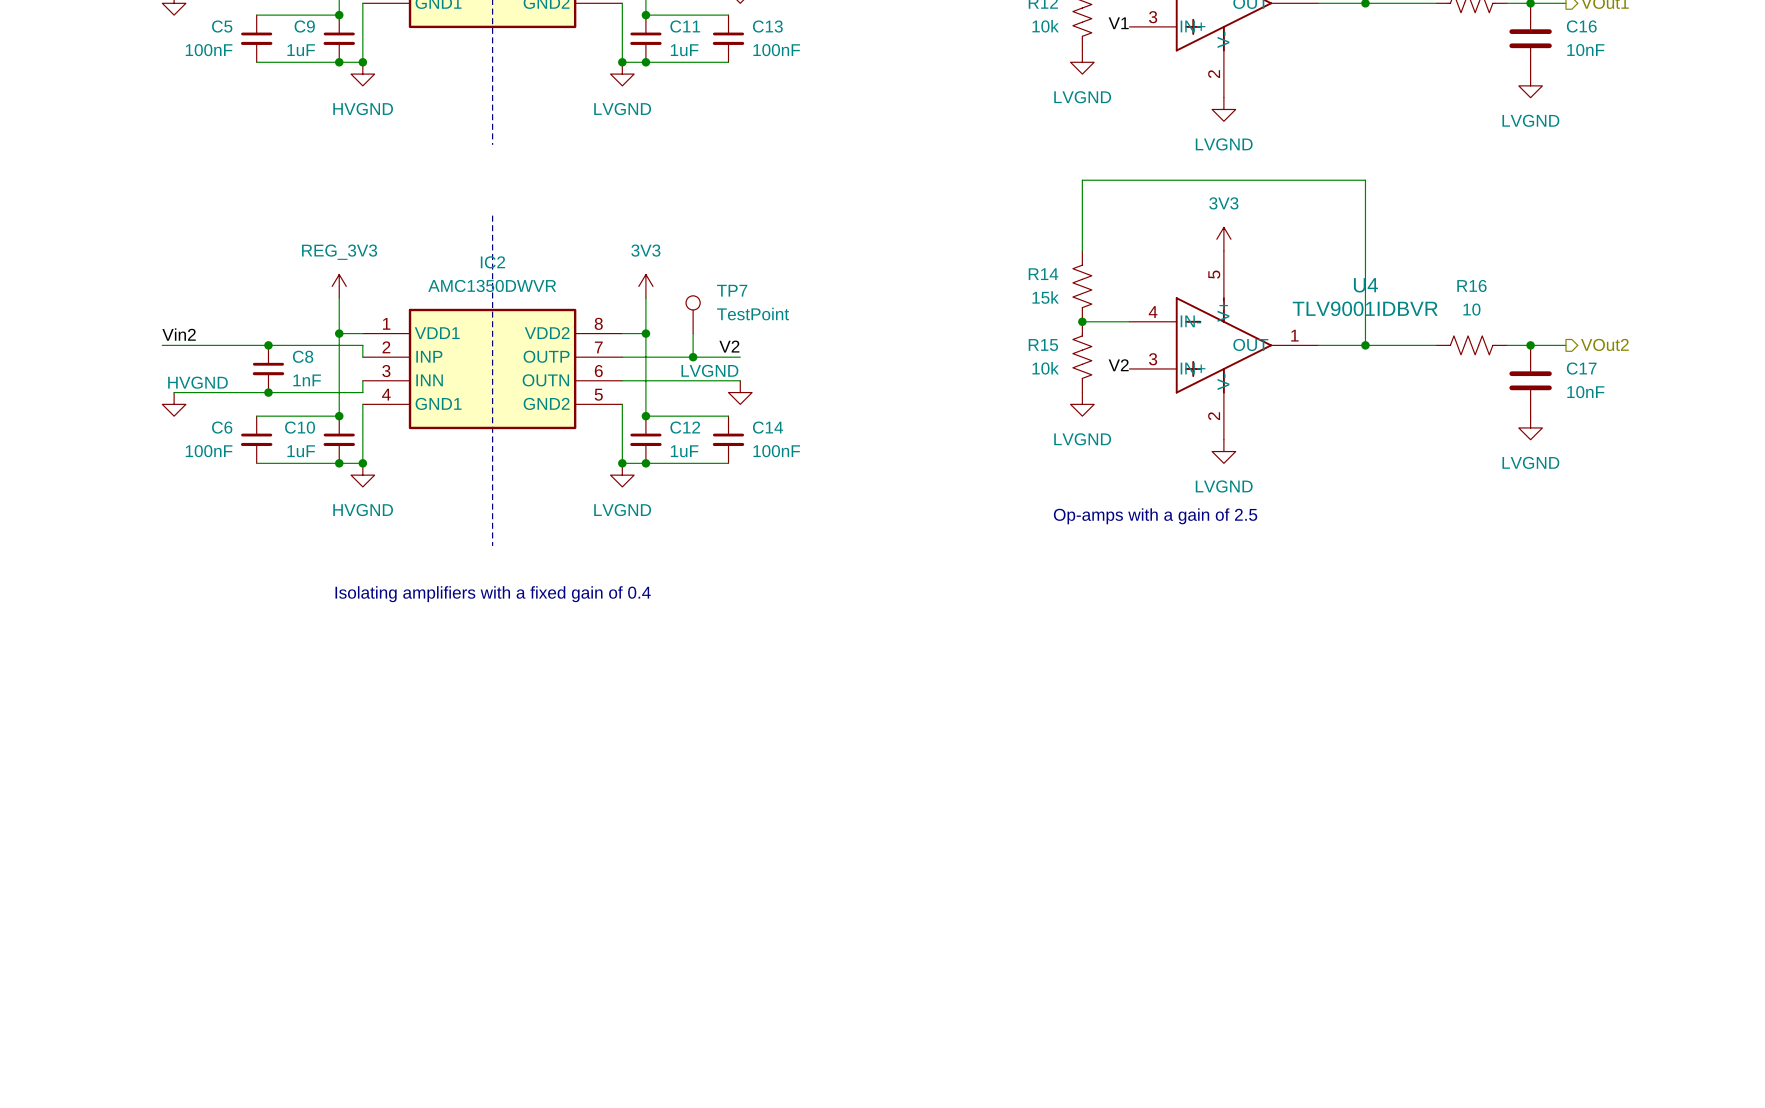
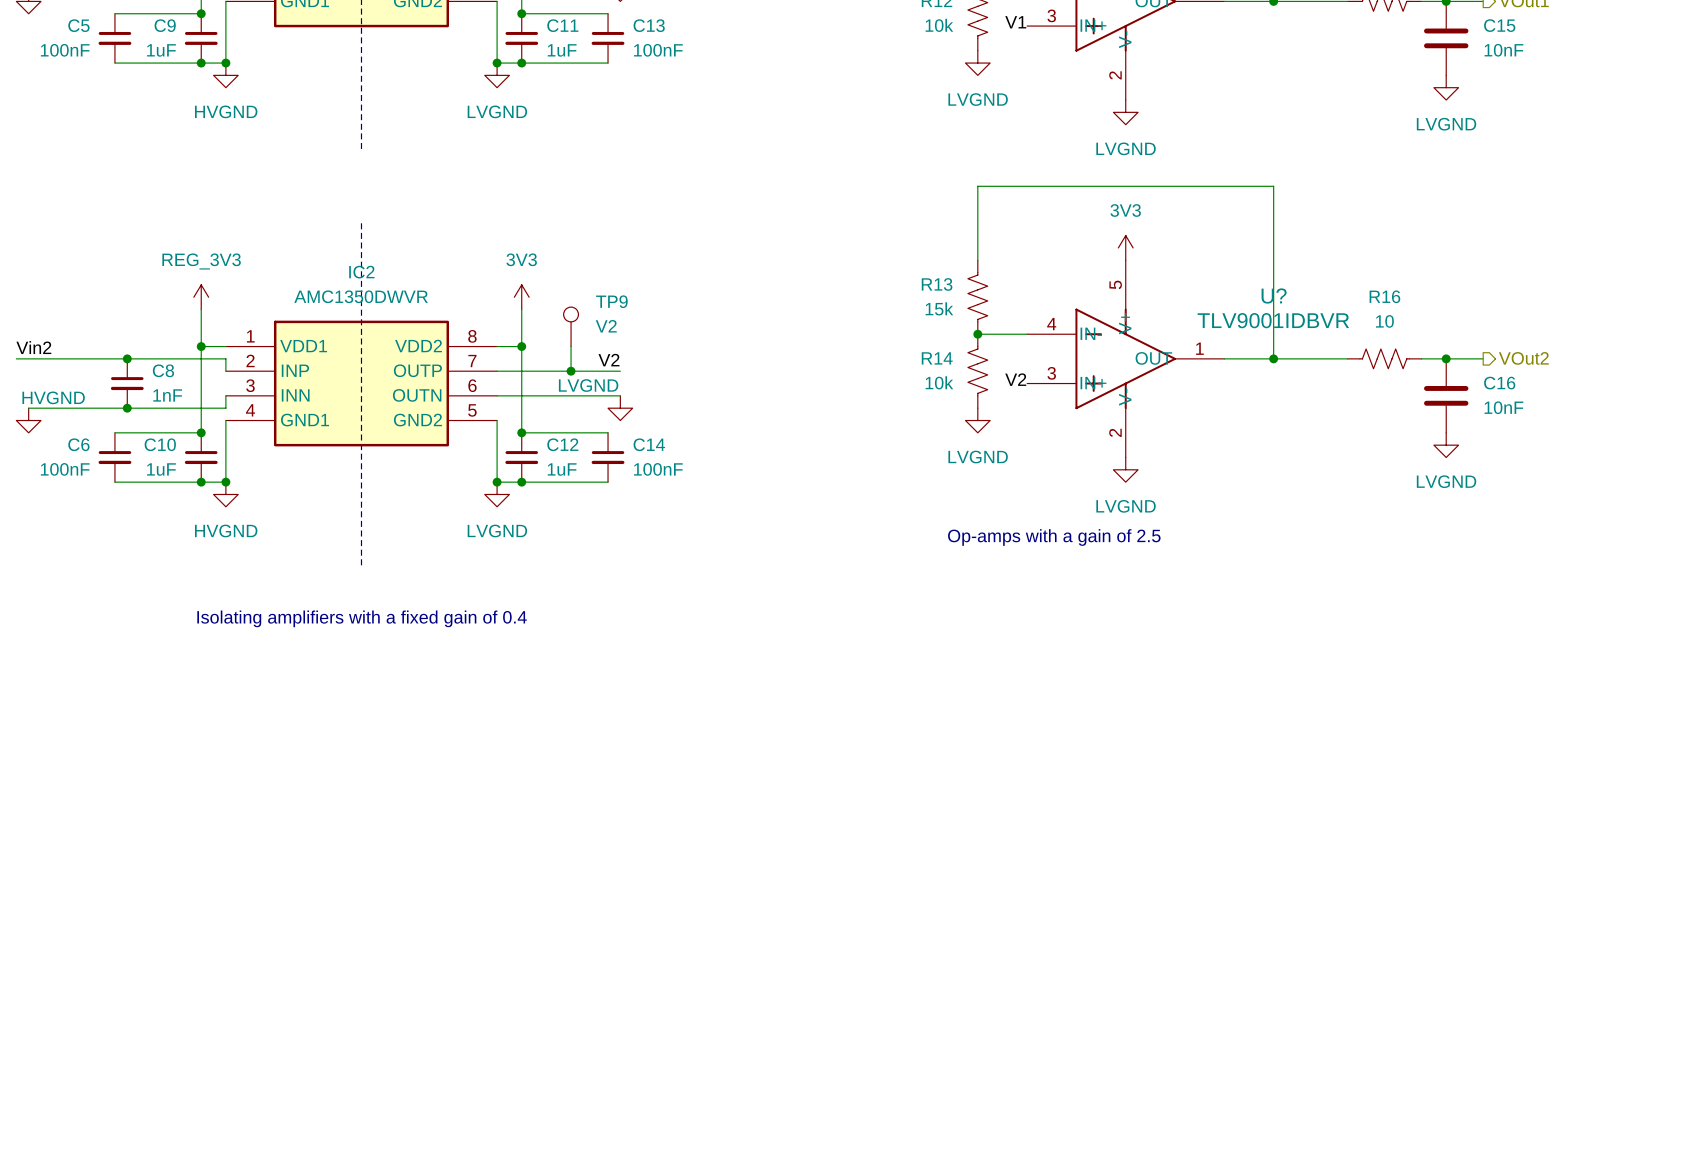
C16 name: C16 (1581, 26) -> C15 (1499, 25)
R14 name: R14 (1043, 274) -> R13 (937, 284)
U4 name: U4 (1365, 285) -> U? (1274, 296)
TP7 name: TP7 (732, 290) -> TP9 (611, 301)
TP7 value: TestPoint (753, 314) -> V2 (606, 326)
R15 name: R15 (1043, 345) -> R14 (937, 358)
C17 name: C17 (1581, 368) -> C16 (1499, 383)

